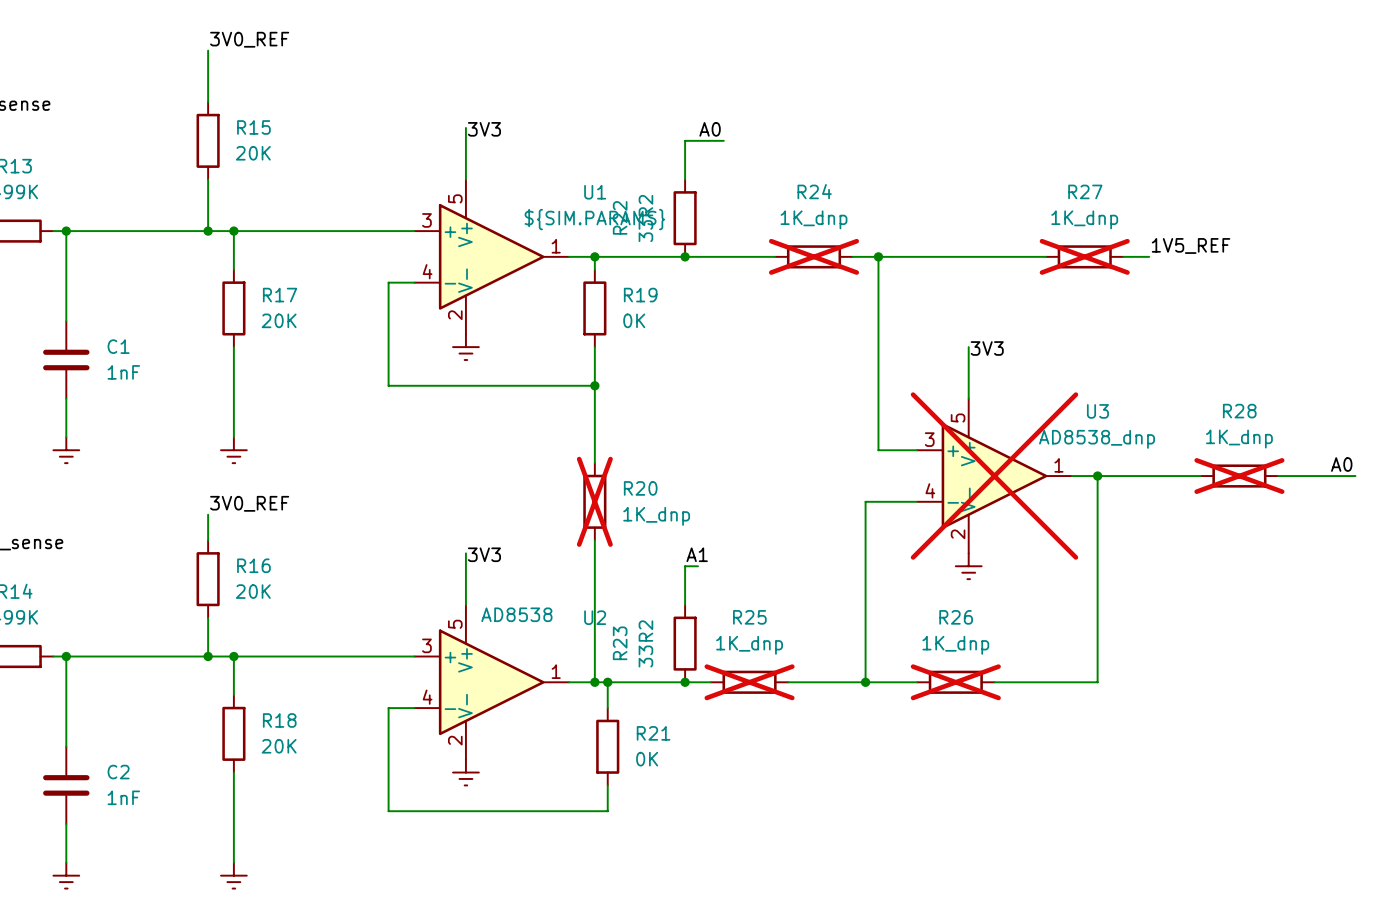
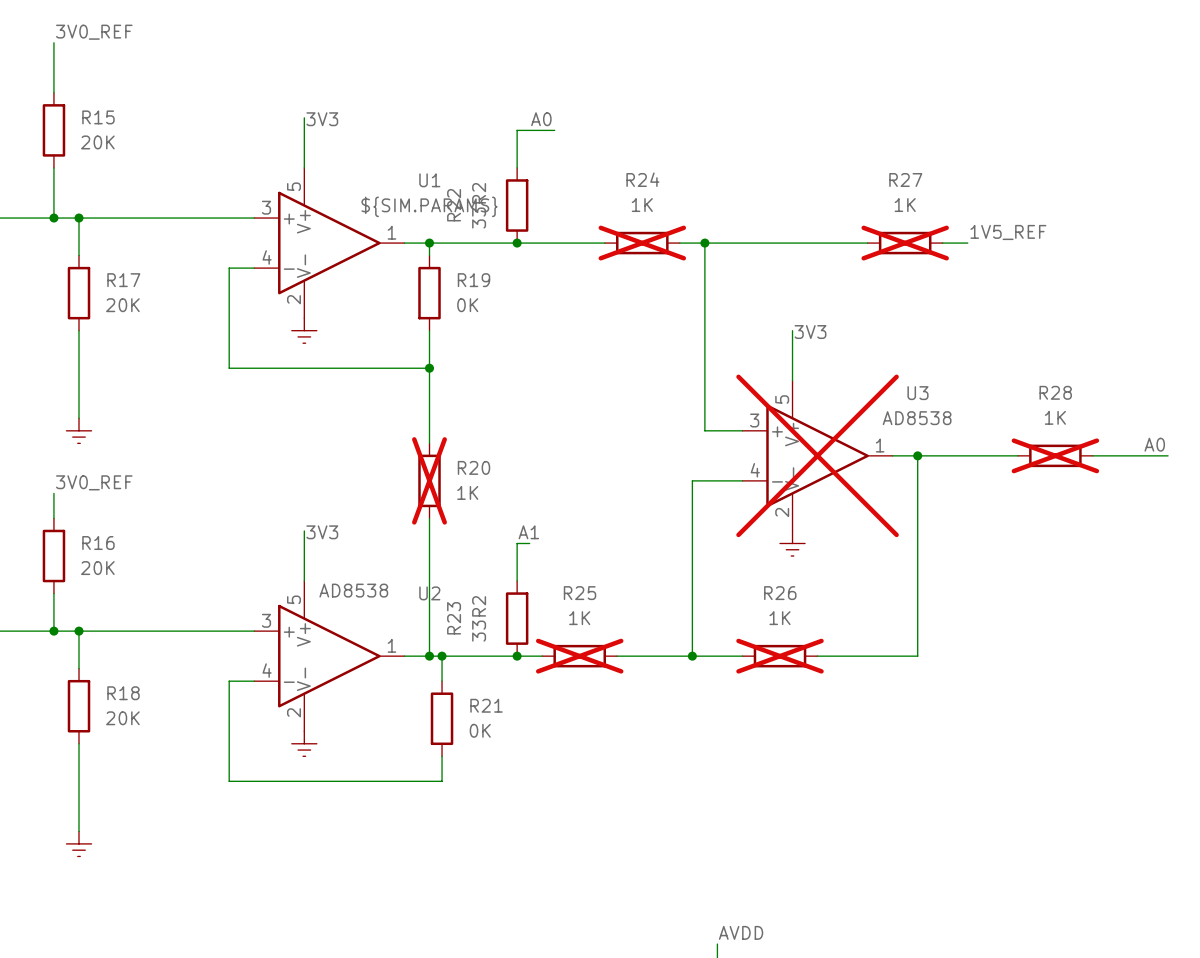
R24 value: 1K_dnp (814, 219) -> 1K (642, 205)
R27 value: 1K_dnp (1084, 219) -> 1K (905, 205)
U3 value: AD8538_dnp (1097, 439) -> AD8538 (917, 418)
R28 value: 1K_dnp (1239, 439) -> 1K (1055, 417)
R20 value: 1K_dnp (656, 516) -> 1K (467, 492)
R25 value: 1K_dnp (749, 645) -> 1K (579, 618)
R26 value: 1K_dnp (955, 645) -> 1K (780, 618)

